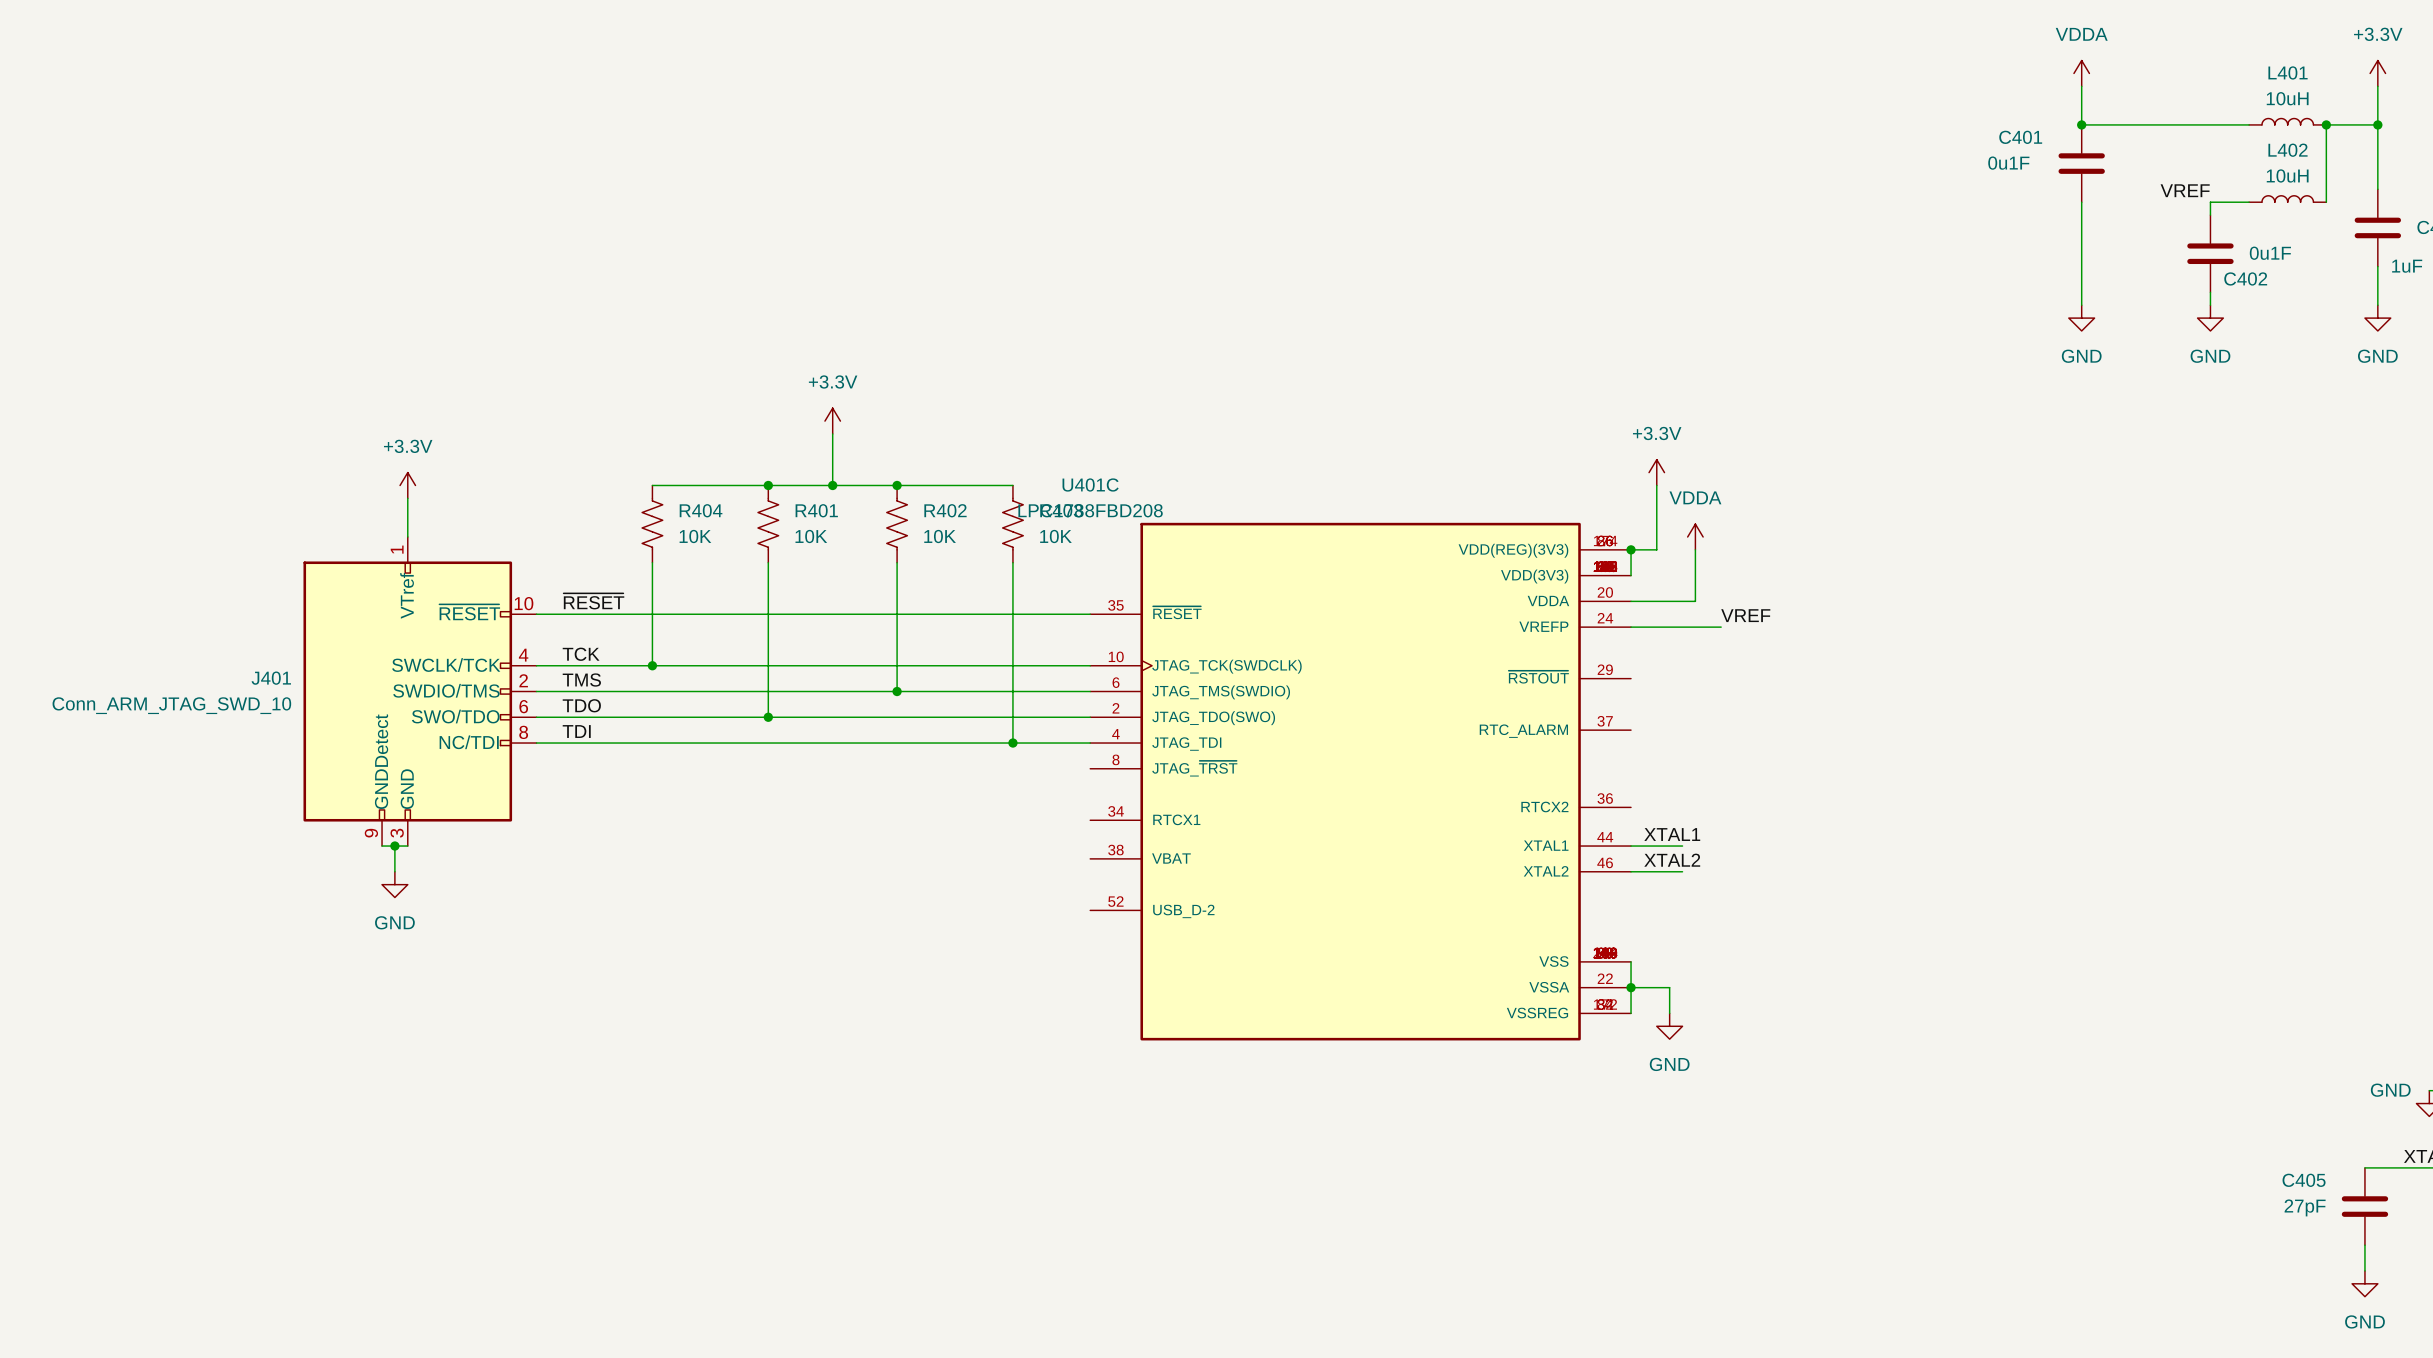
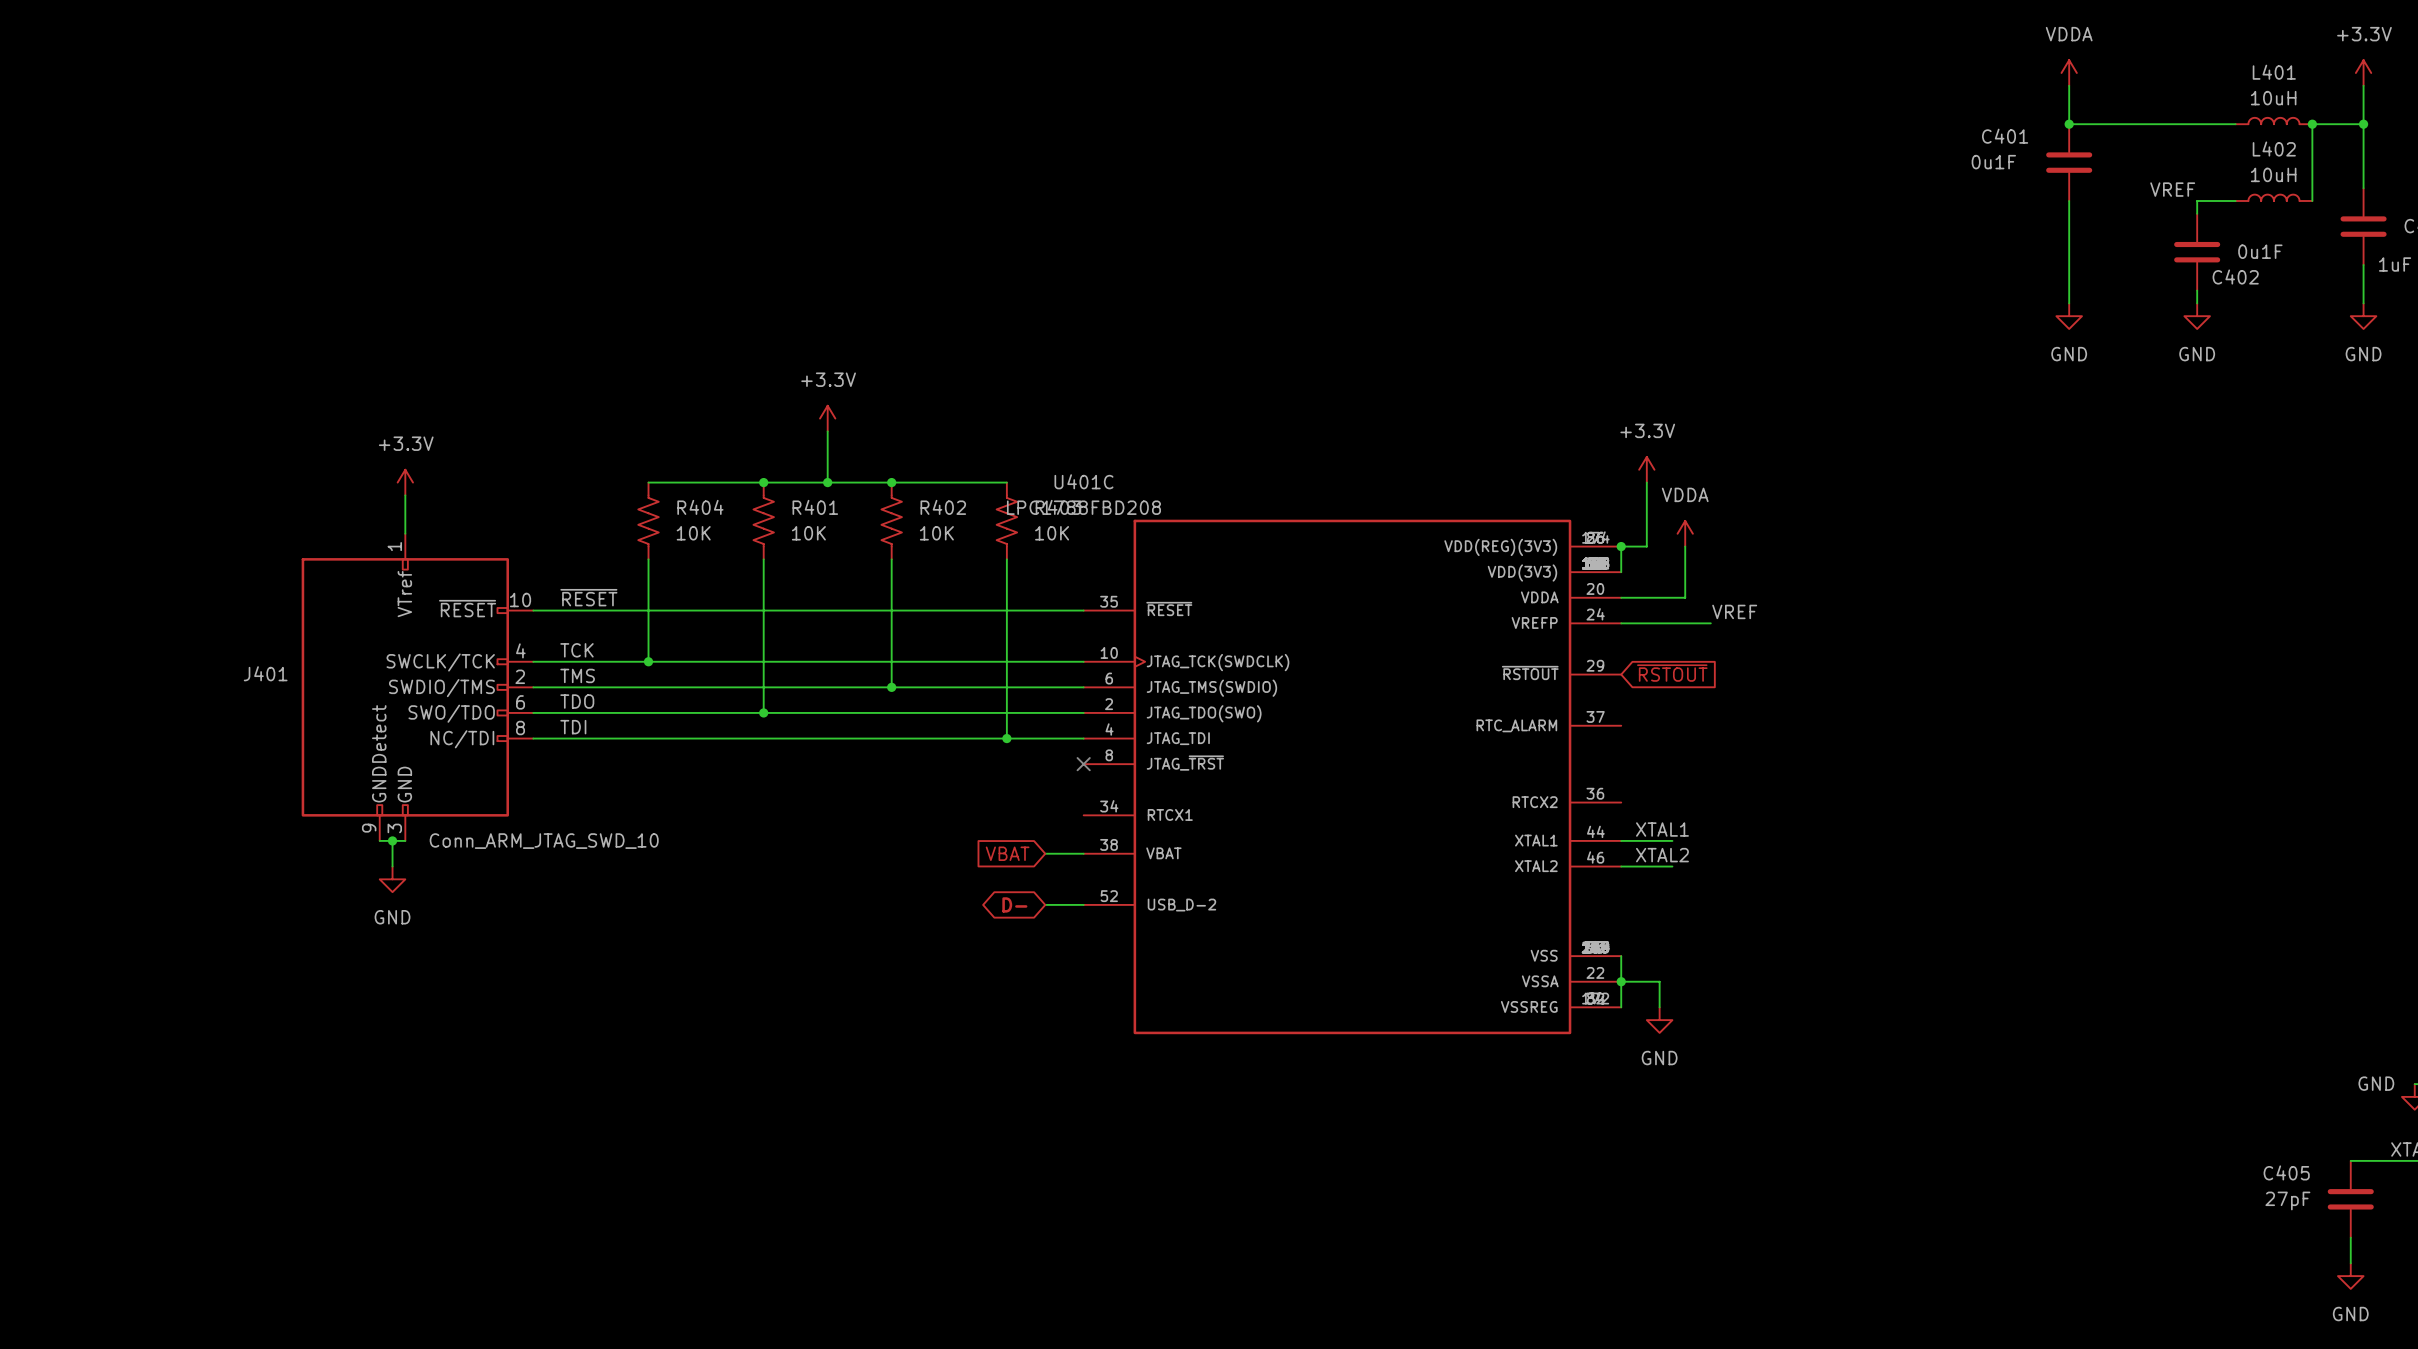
global label: none -> ~{RSTOUT} (1672, 673)
J401 value position: Conn_ARM_JTAG_SWD_10 (171, 705) -> Conn_ARM_JTAG_SWD_10 (544, 841)
no-connect mark: none -> (1083, 764)
global label: none -> VBAT (1007, 853)
wire: none -> (1045, 853) (1083, 853)
global label: none -> D- (1014, 904)
wire: none -> (1045, 904) (1083, 904)

